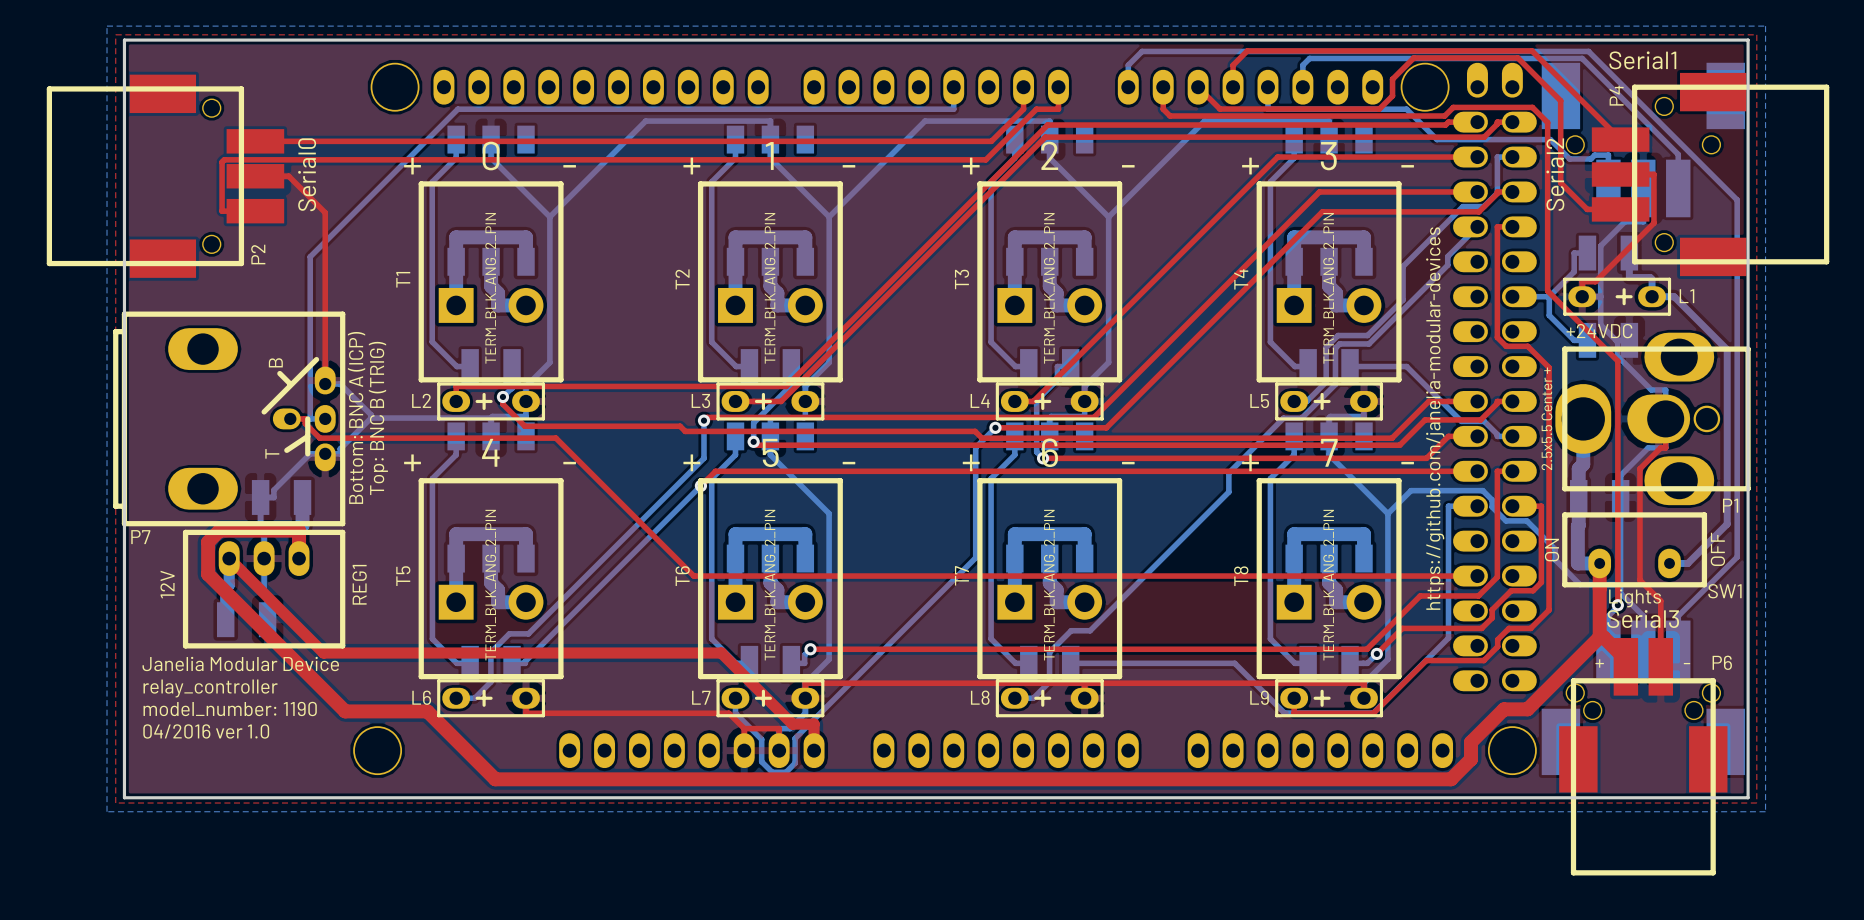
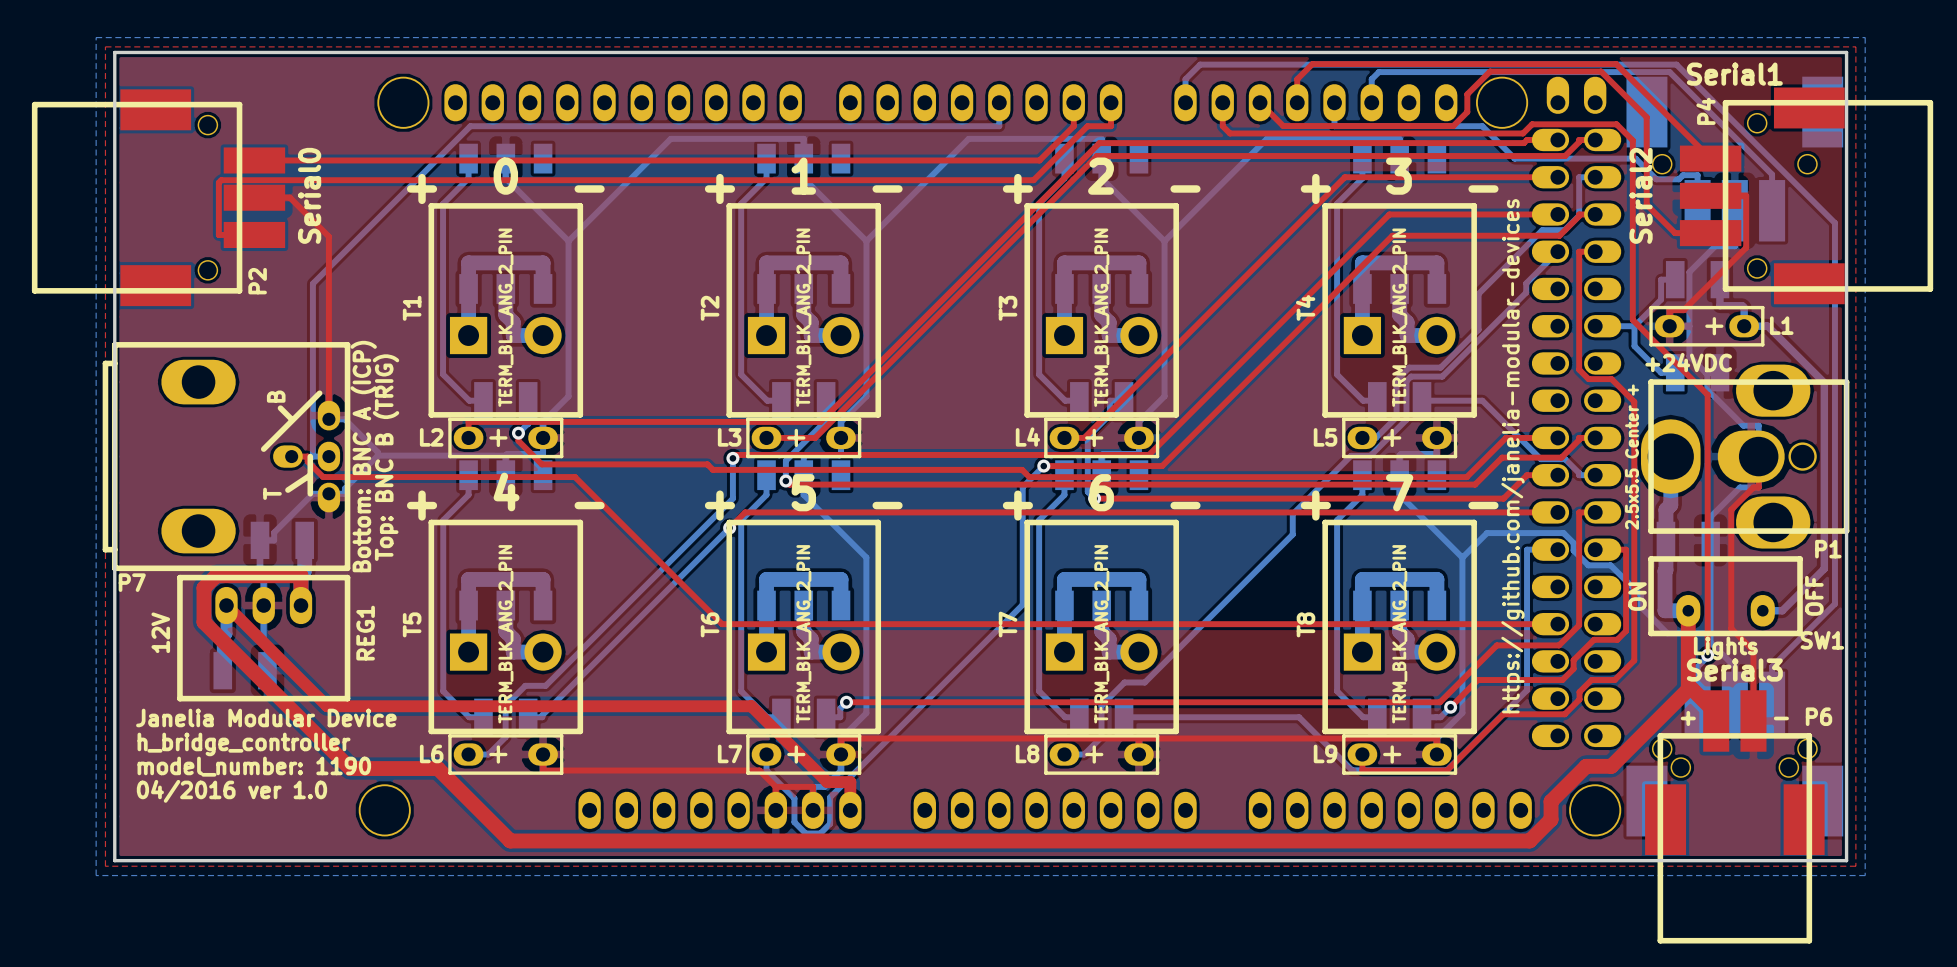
text: relay_controller (210, 688) -> h_bridge_controller (244, 744)

